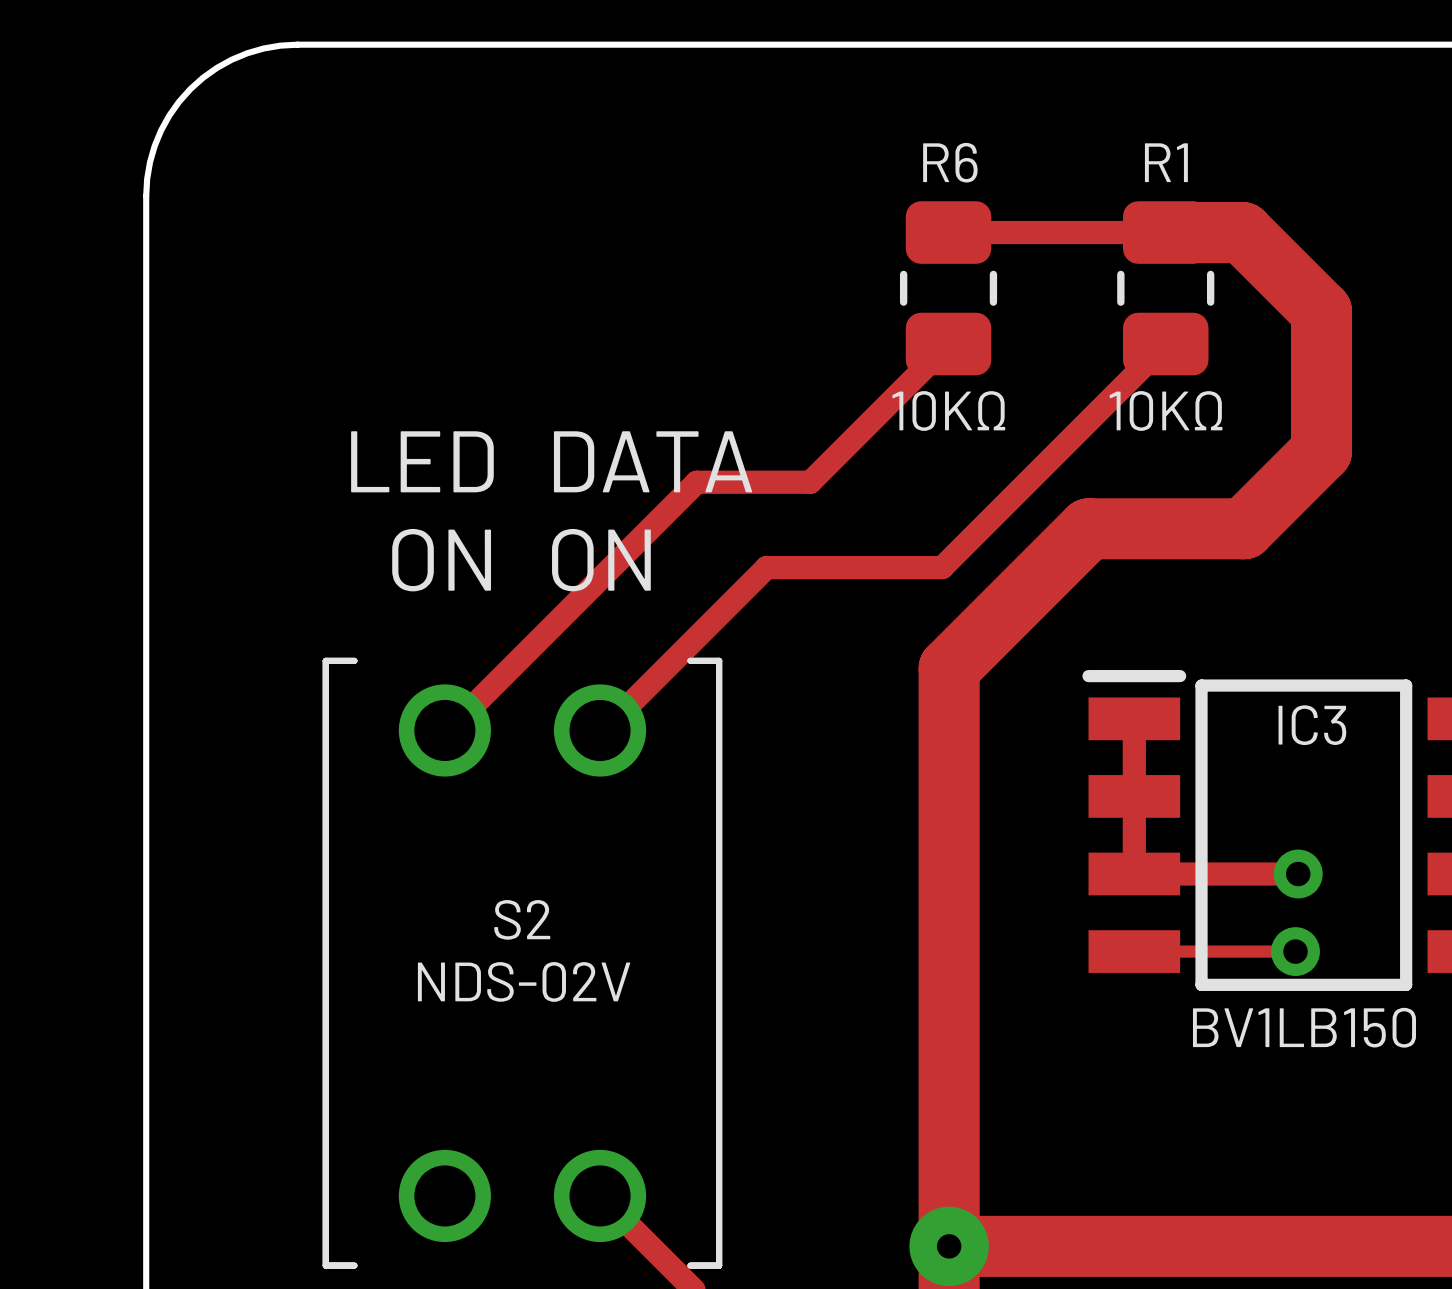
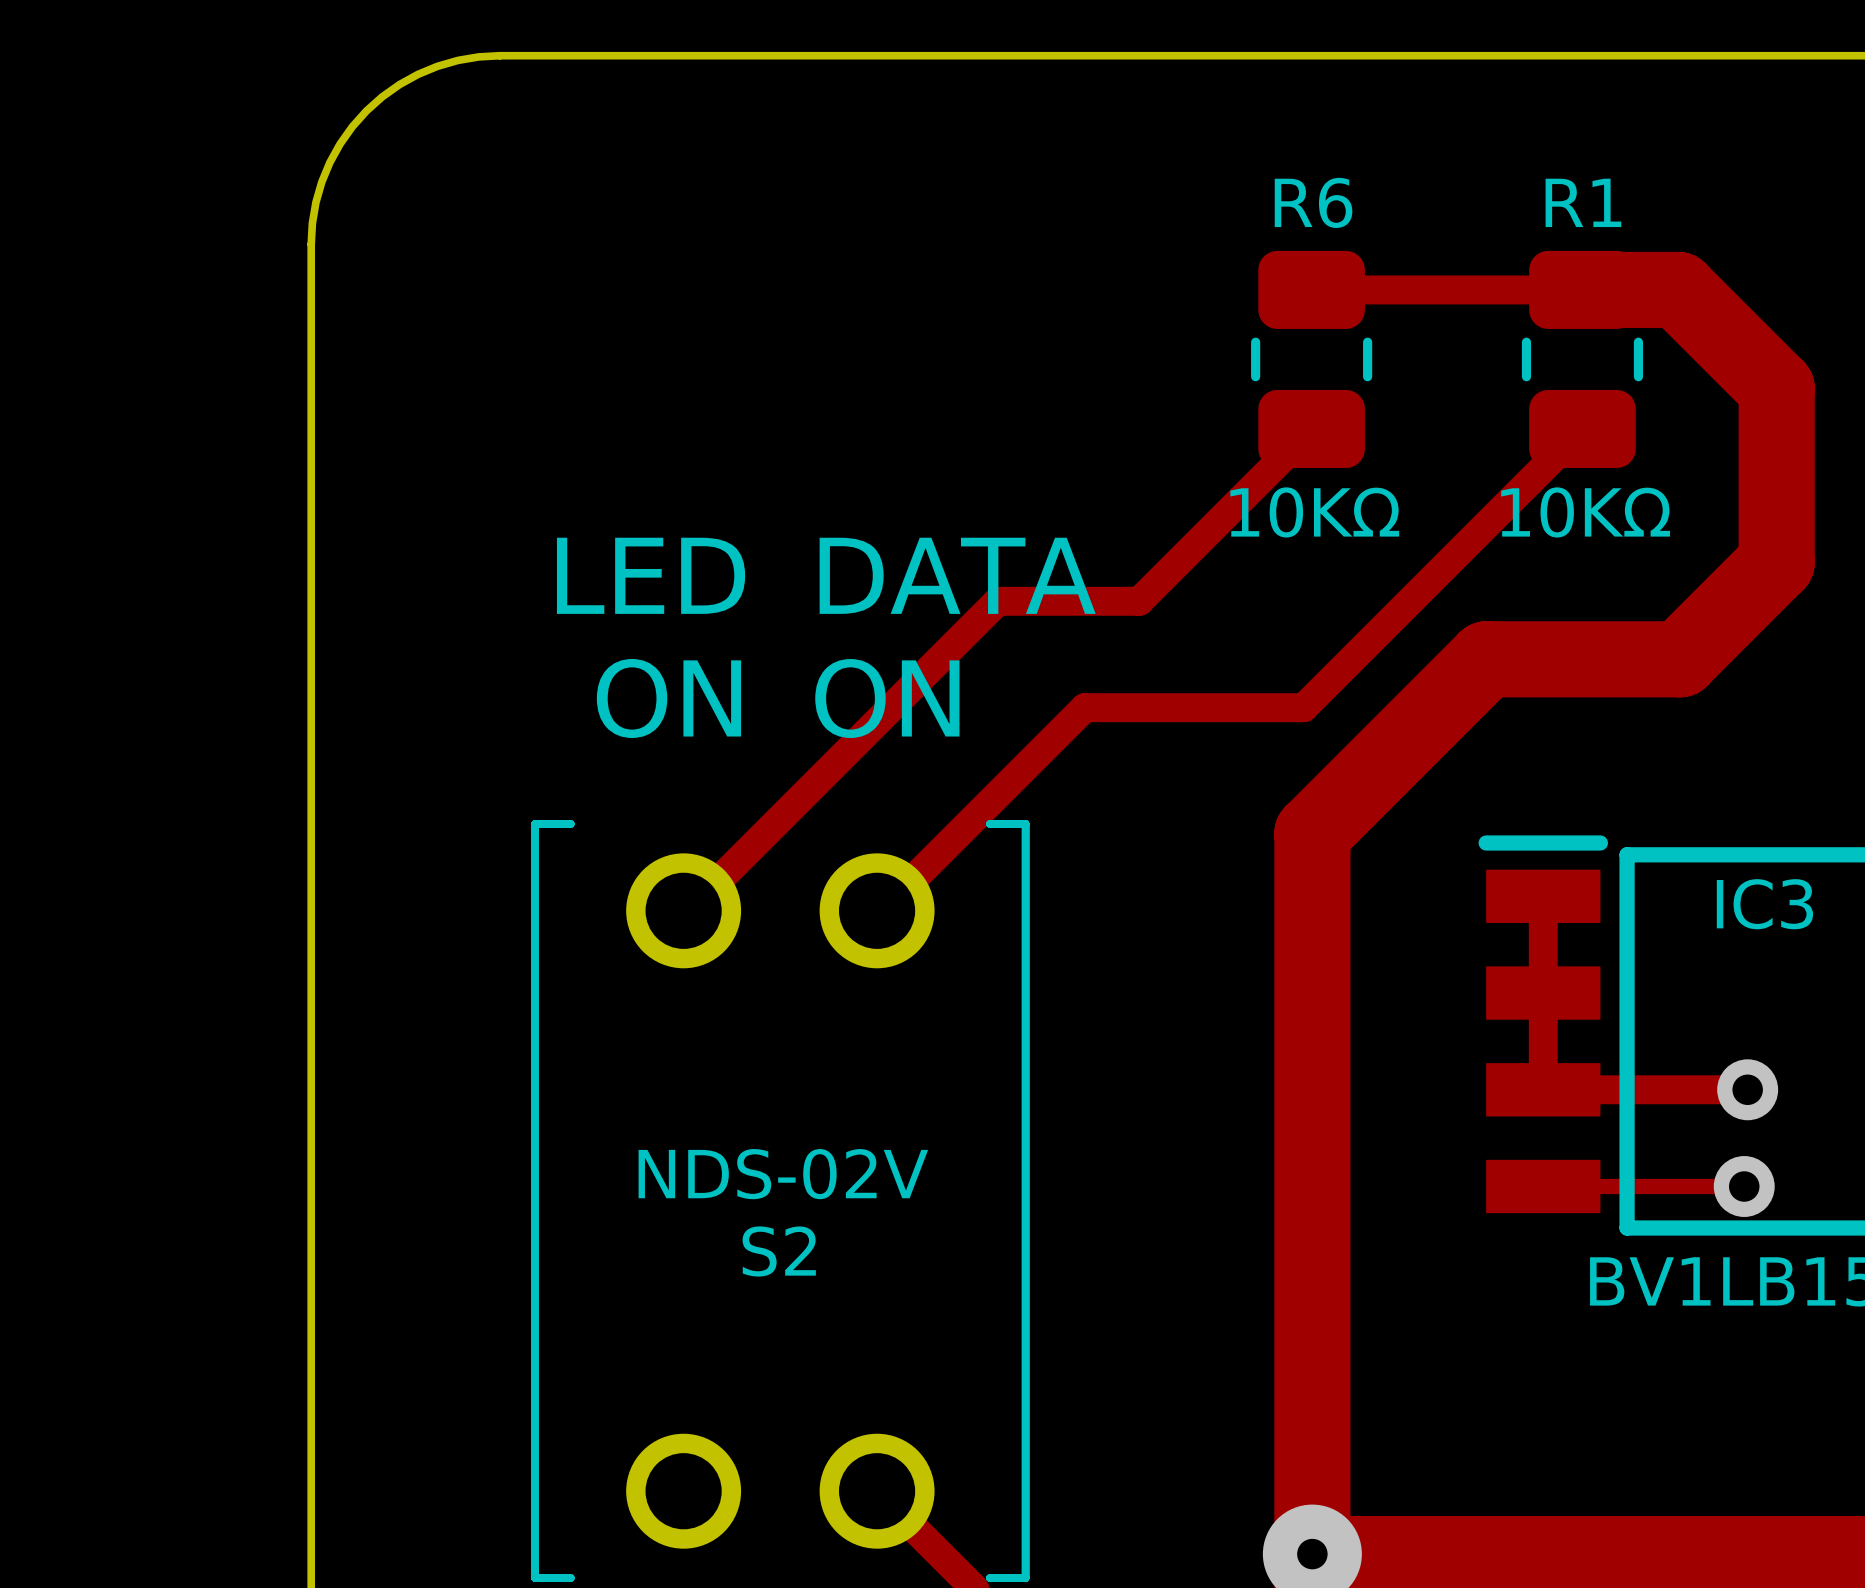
S2 name position: S2 (522, 919) -> S2 (779, 1251)
S2 value position: NDS-02V (524, 981) -> NDS-02V (783, 1174)

